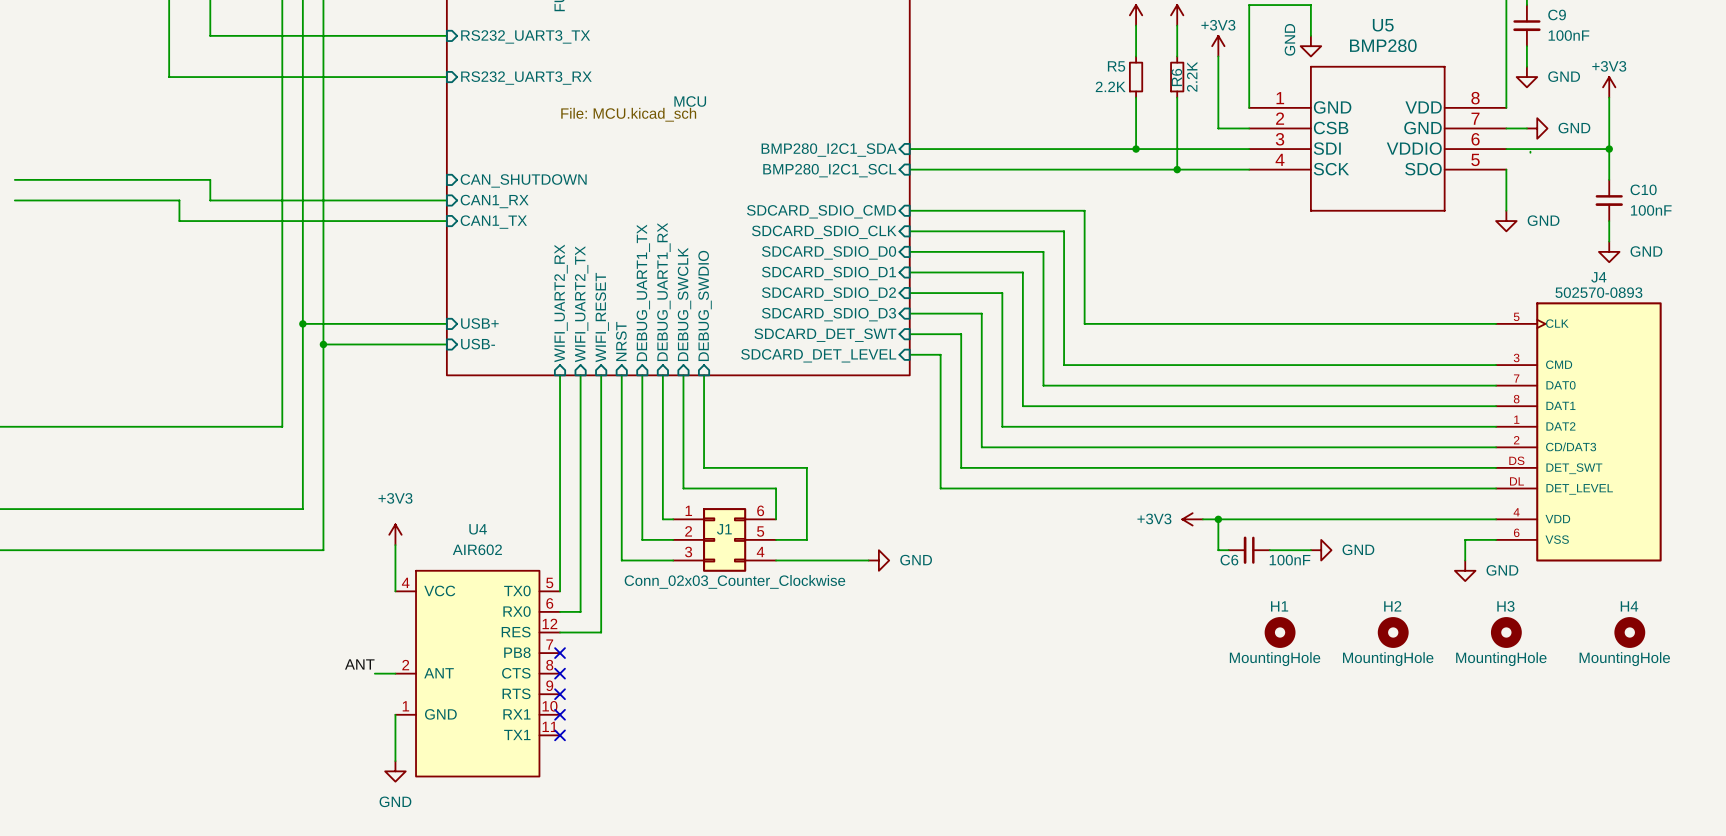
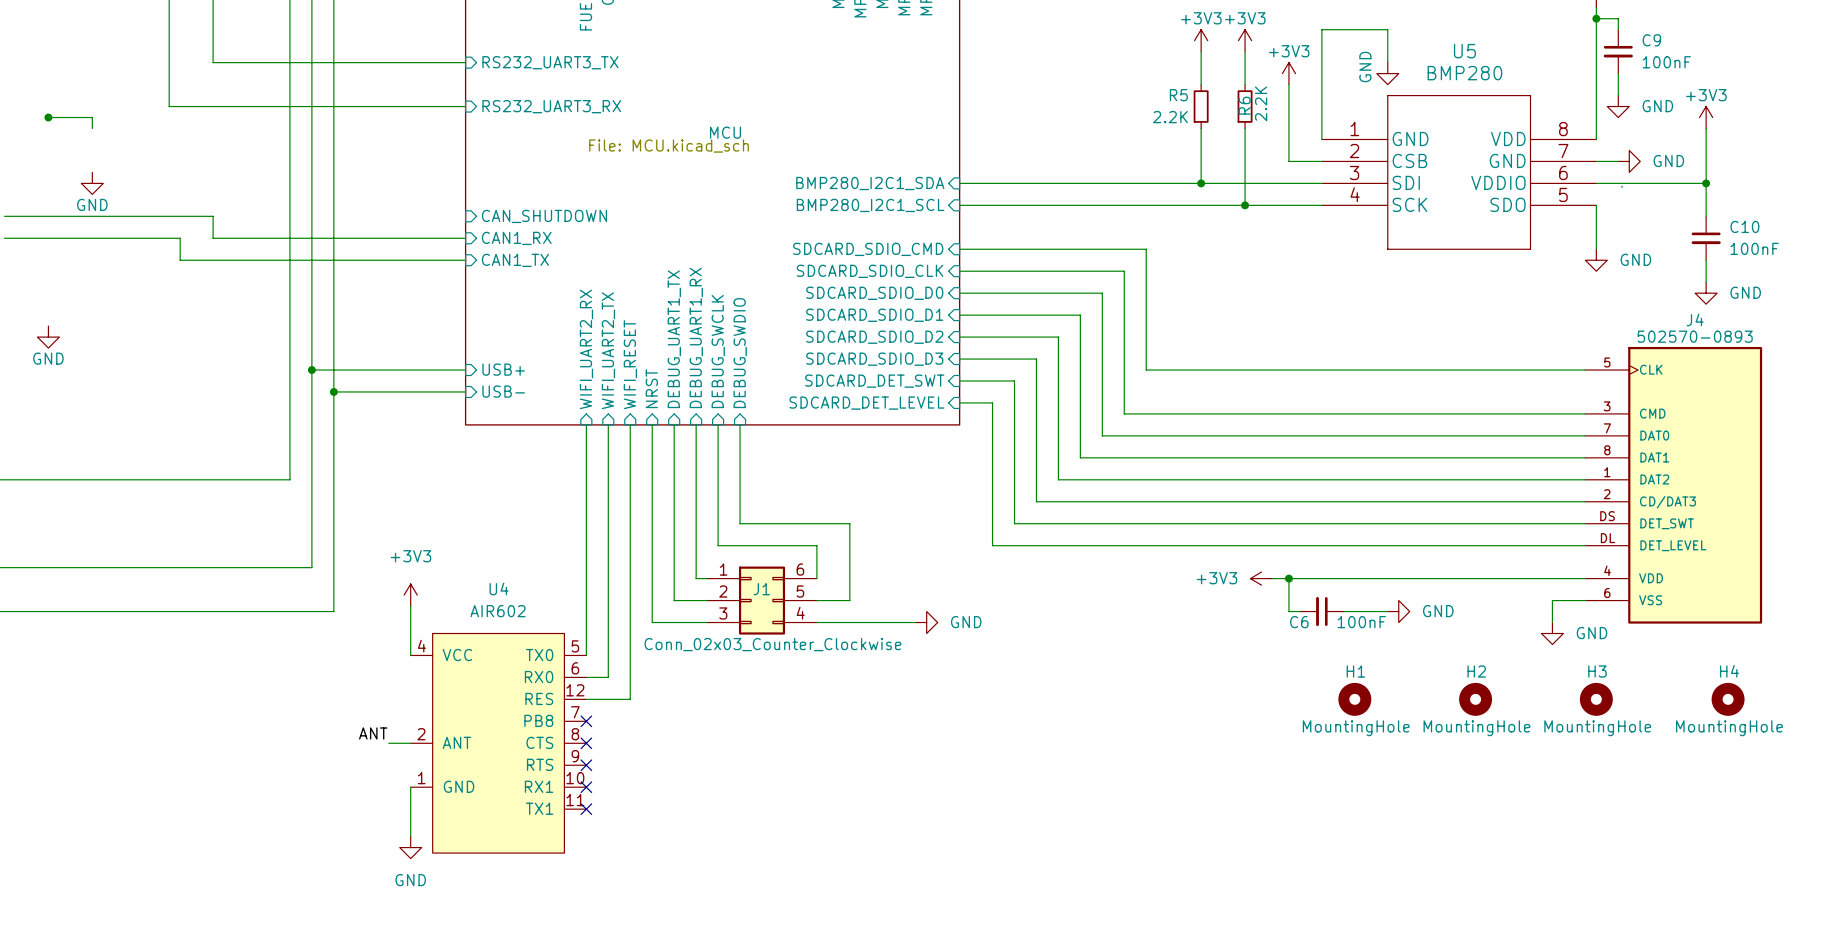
wire: none -> (48, 117) (92, 117) (92, 128)
junction: none -> (48, 117)
power symbol: none -> GND (92, 183)
power symbol: none -> GND (48, 337)

